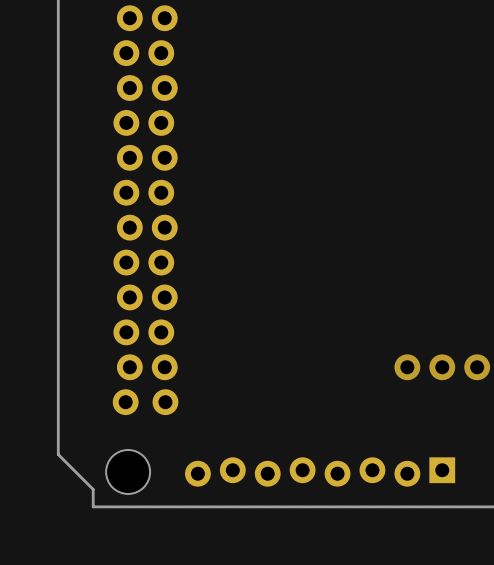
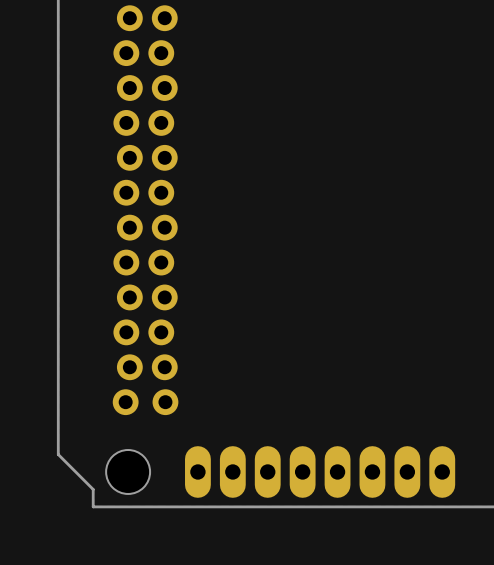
via: (407, 367) -> none
via: (442, 367) -> none
via: (477, 367) -> none
part footprint: [185, 457, 456, 487] -> [185, 446, 456, 498]

